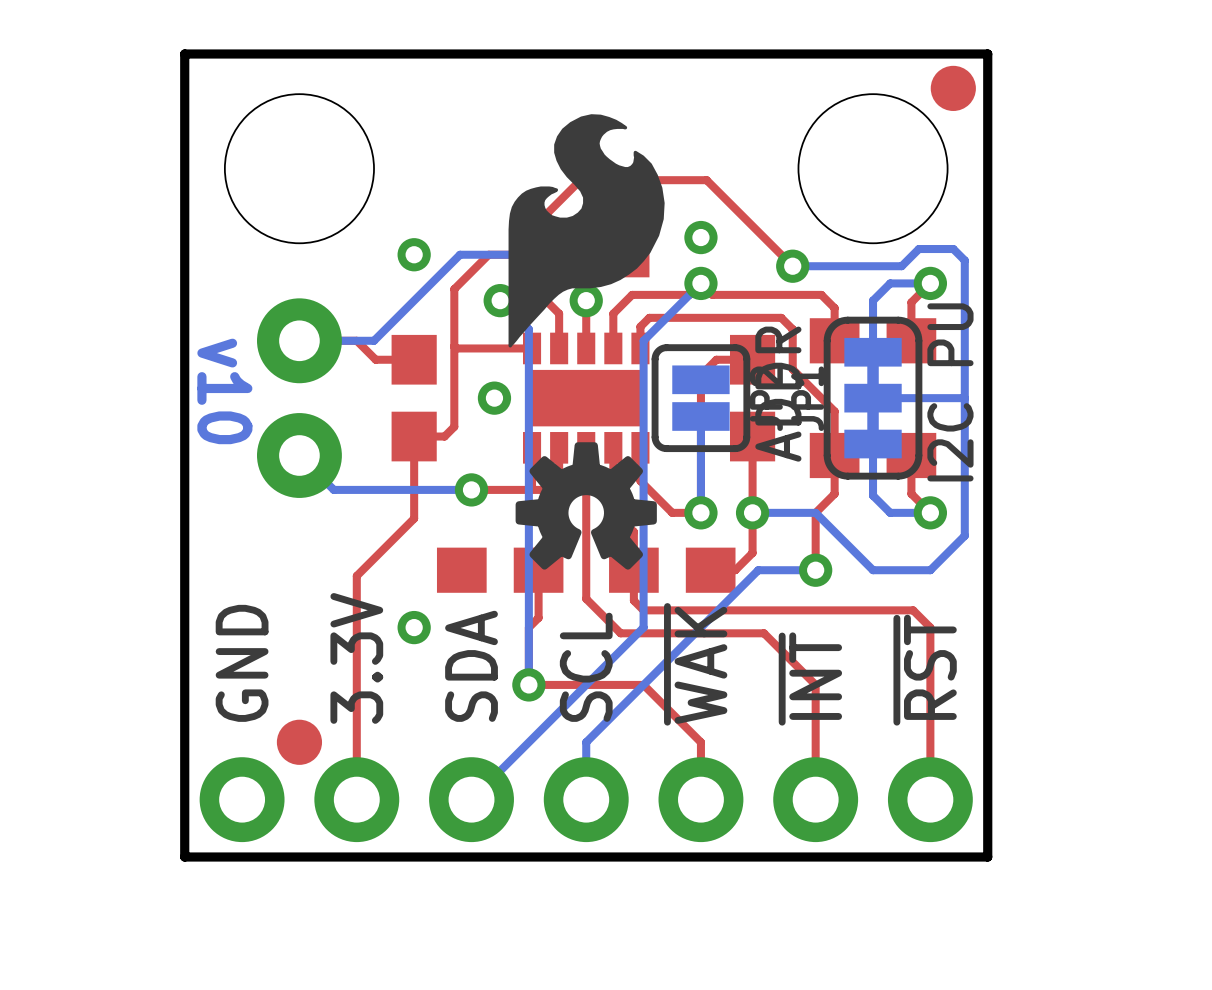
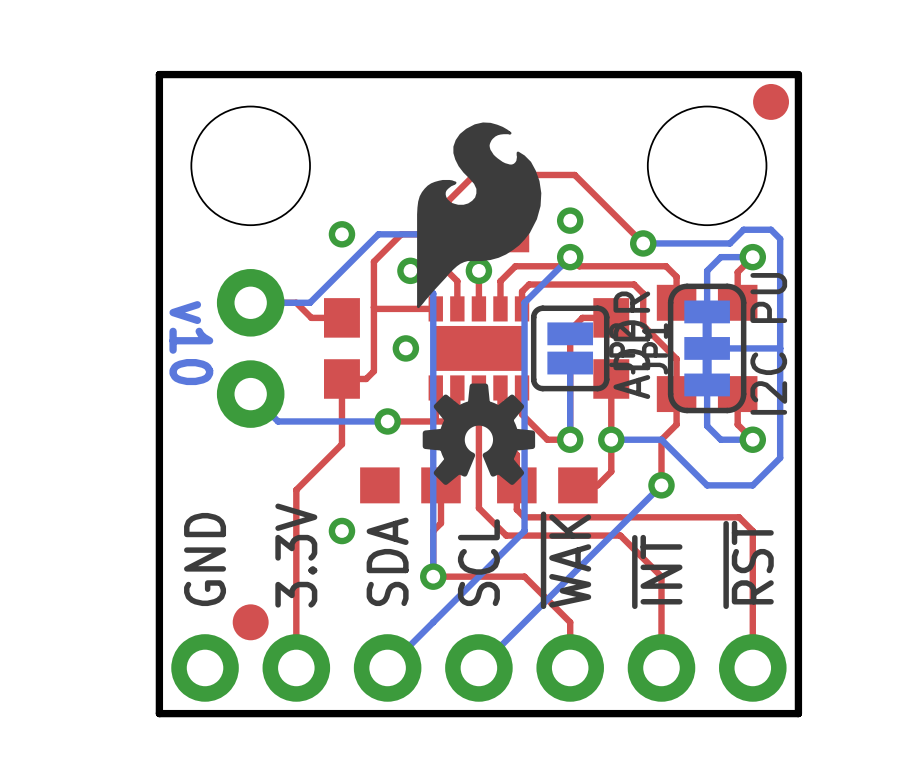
bottom track: (815, 570) (758, 570) (586, 742) (586, 799) -> (661, 485) (478, 667)

